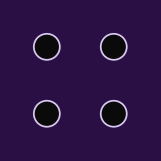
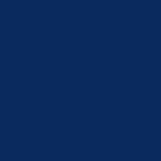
part: (46, 46) -> none
part: (113, 46) -> none
part: (46, 113) -> none
part: (113, 113) -> none

